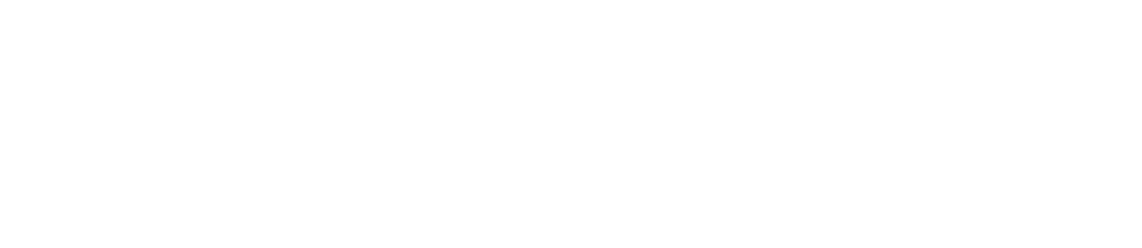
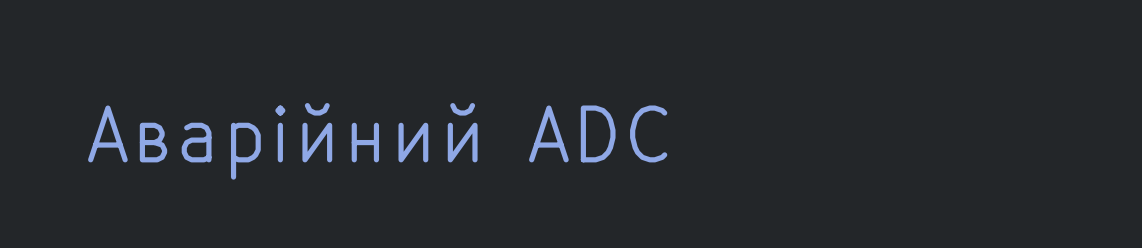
text: none -> Аварійний ADC (377, 141)

